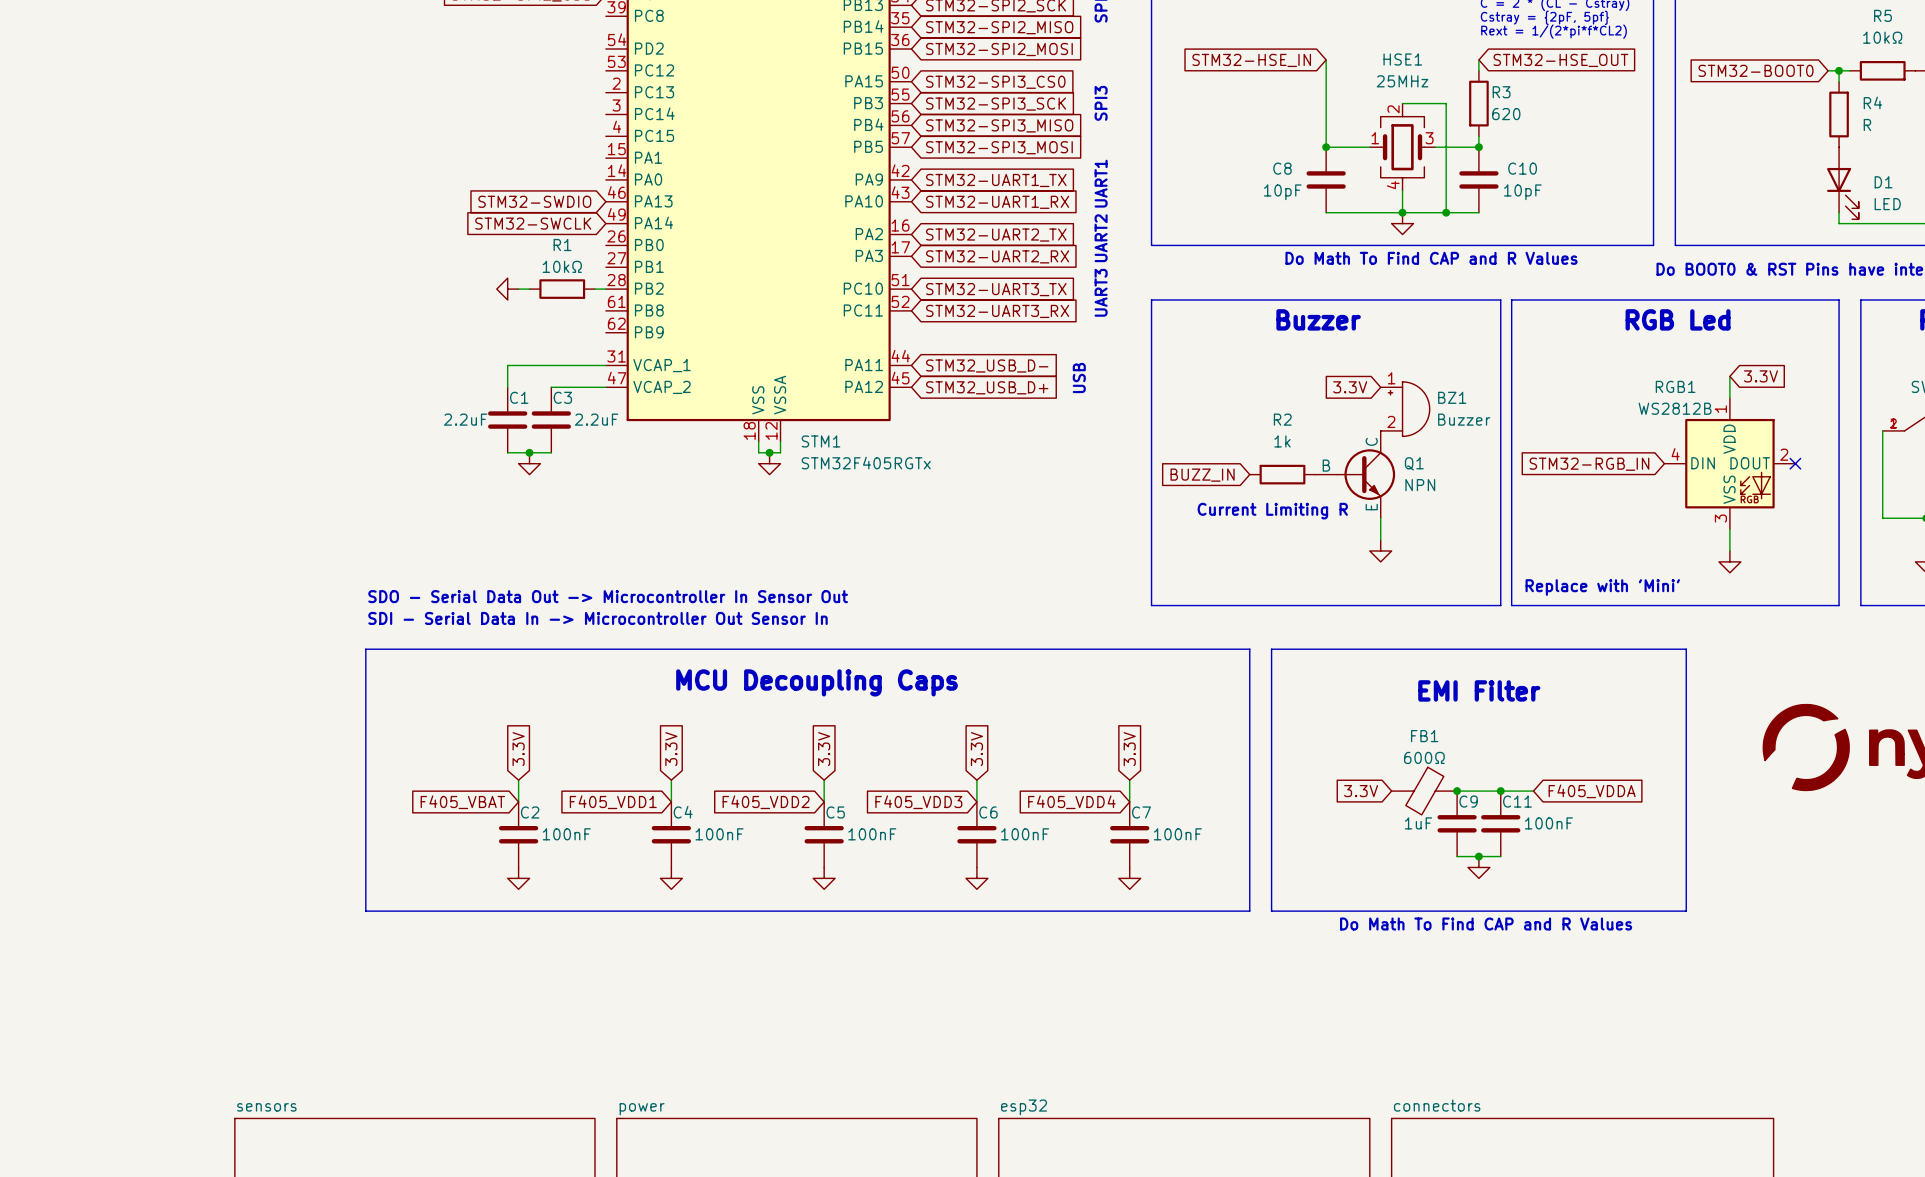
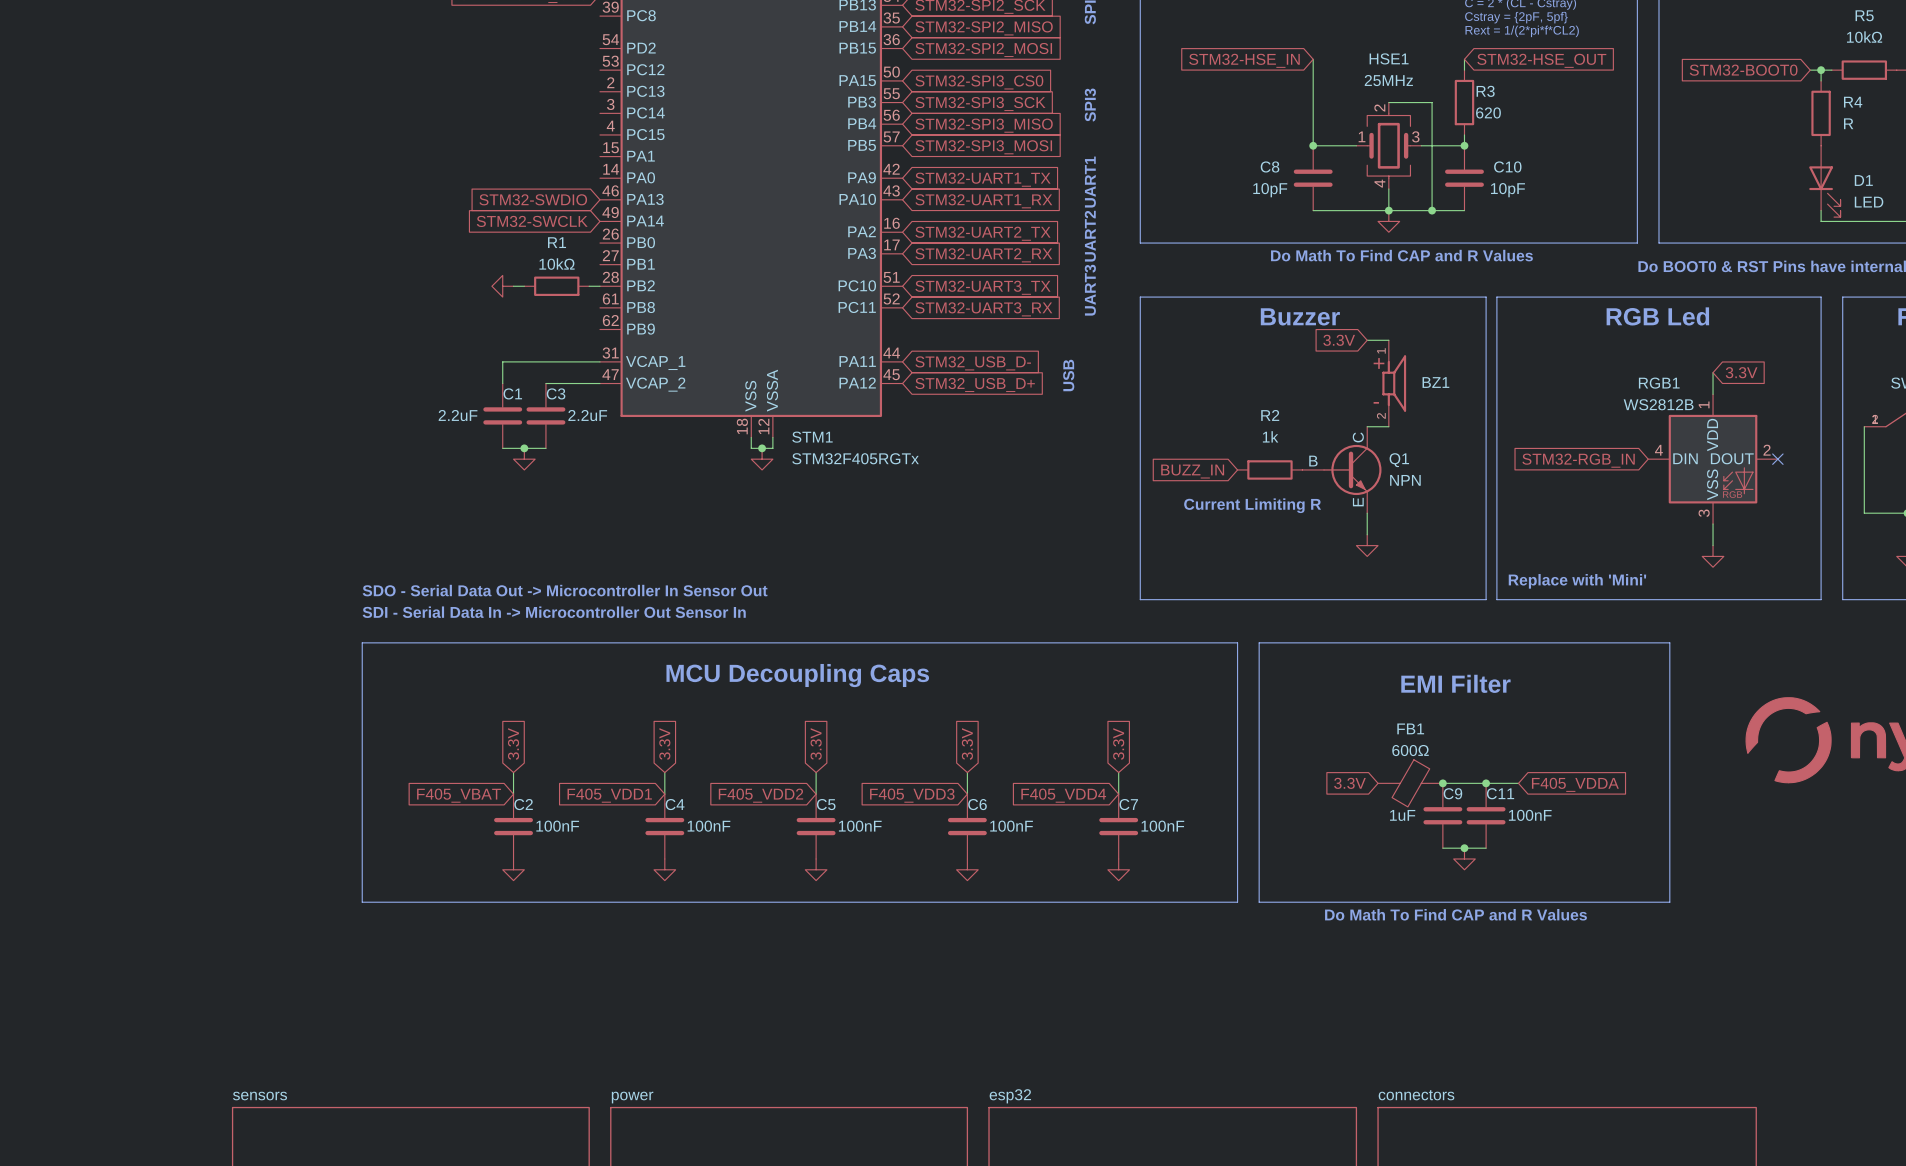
wire: none -> (1367, 340) (1388, 340)
BZ1 symbol: [1380, 381, 1430, 437] -> [1382, 340, 1407, 427]
global label position: 3.3V (1350, 387) -> 3.3V (1339, 340)
BZ1 value: Buzzer (1464, 419) -> none

